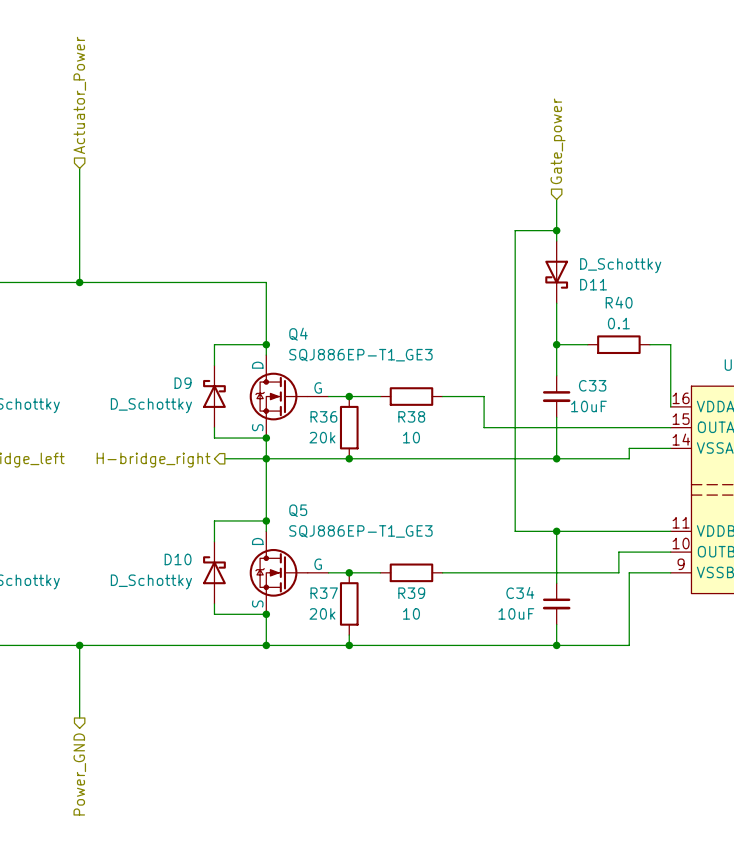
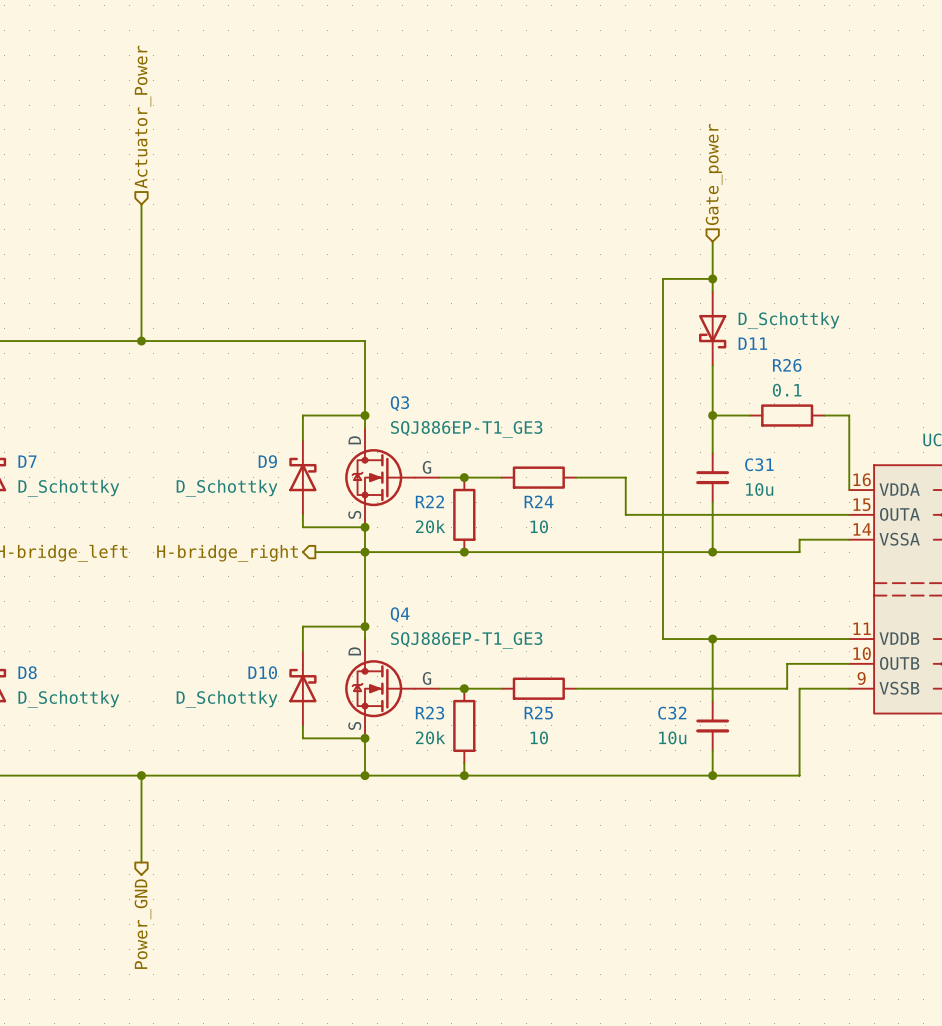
R40 name: R40 (619, 302) -> R26 (787, 365)
Q4 name: Q4 (298, 334) -> Q3 (399, 403)
C33 name: C33 (592, 385) -> C31 (759, 464)
C33 value: 10uF (588, 406) -> 10u (759, 489)
R36 name: R36 (323, 416) -> R22 (429, 501)
R38 name: R38 (411, 416) -> R24 (539, 501)
Q5 name: Q5 (298, 510) -> Q4 (400, 614)
C34 name: C34 (520, 592) -> C32 (672, 713)
R37 name: R37 (324, 593) -> R23 (430, 713)
R39 name: R39 (411, 593) -> R25 (538, 713)
C34 value: 10uF (516, 613) -> 10u (672, 737)

